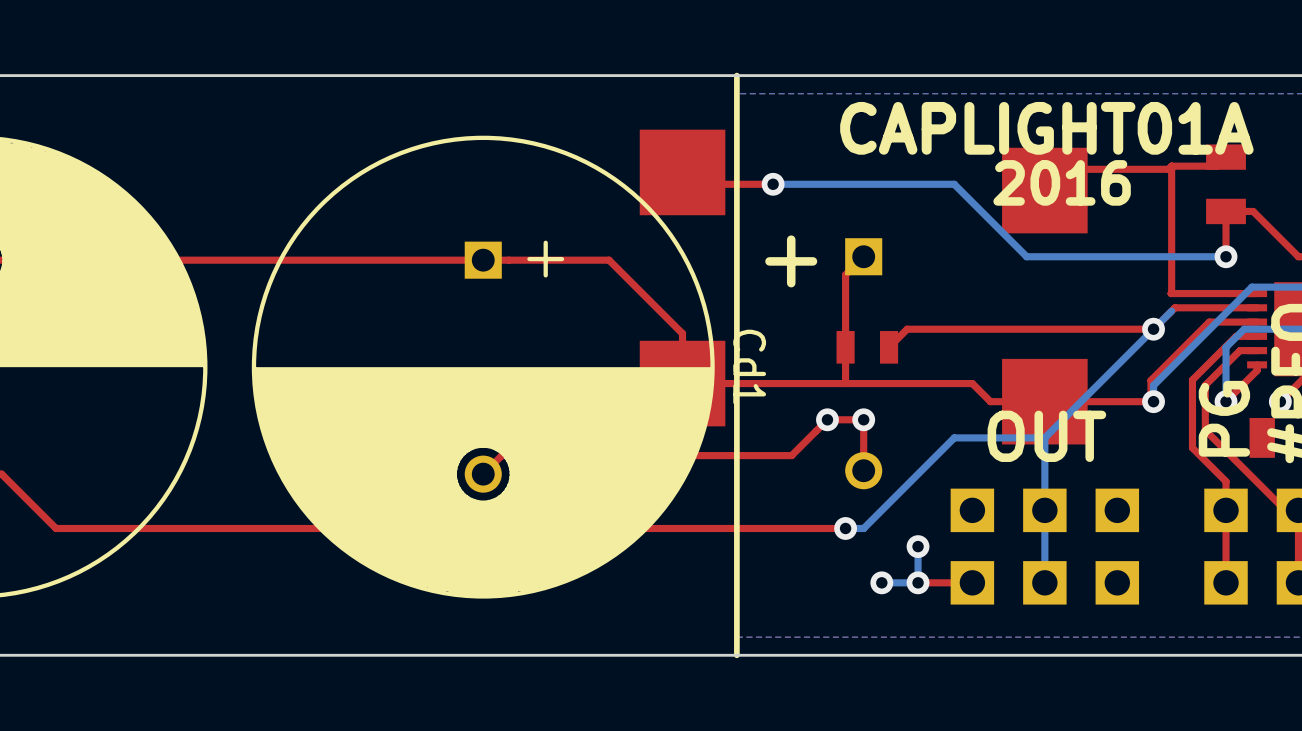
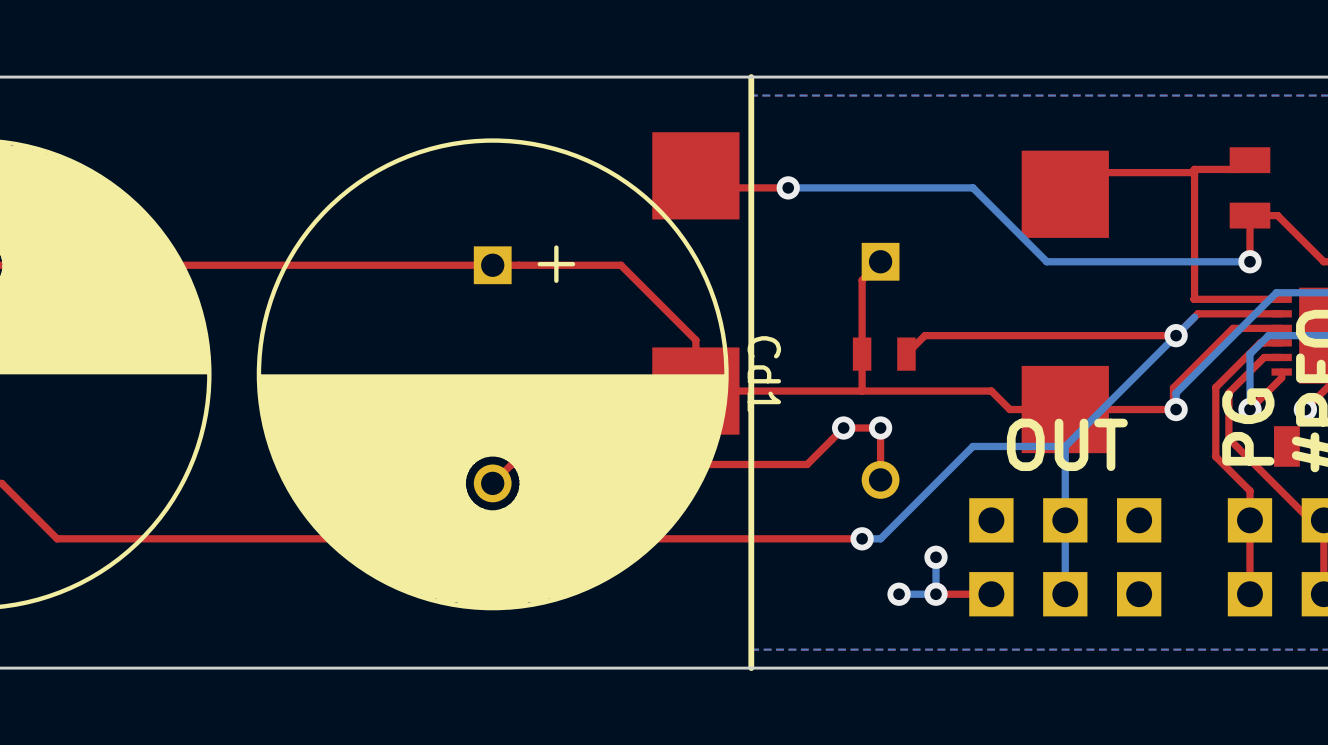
text: CAPLIGHT01A (1046, 128) -> none
text: 2016 (1062, 182) -> none
text: + (791, 261) -> none

